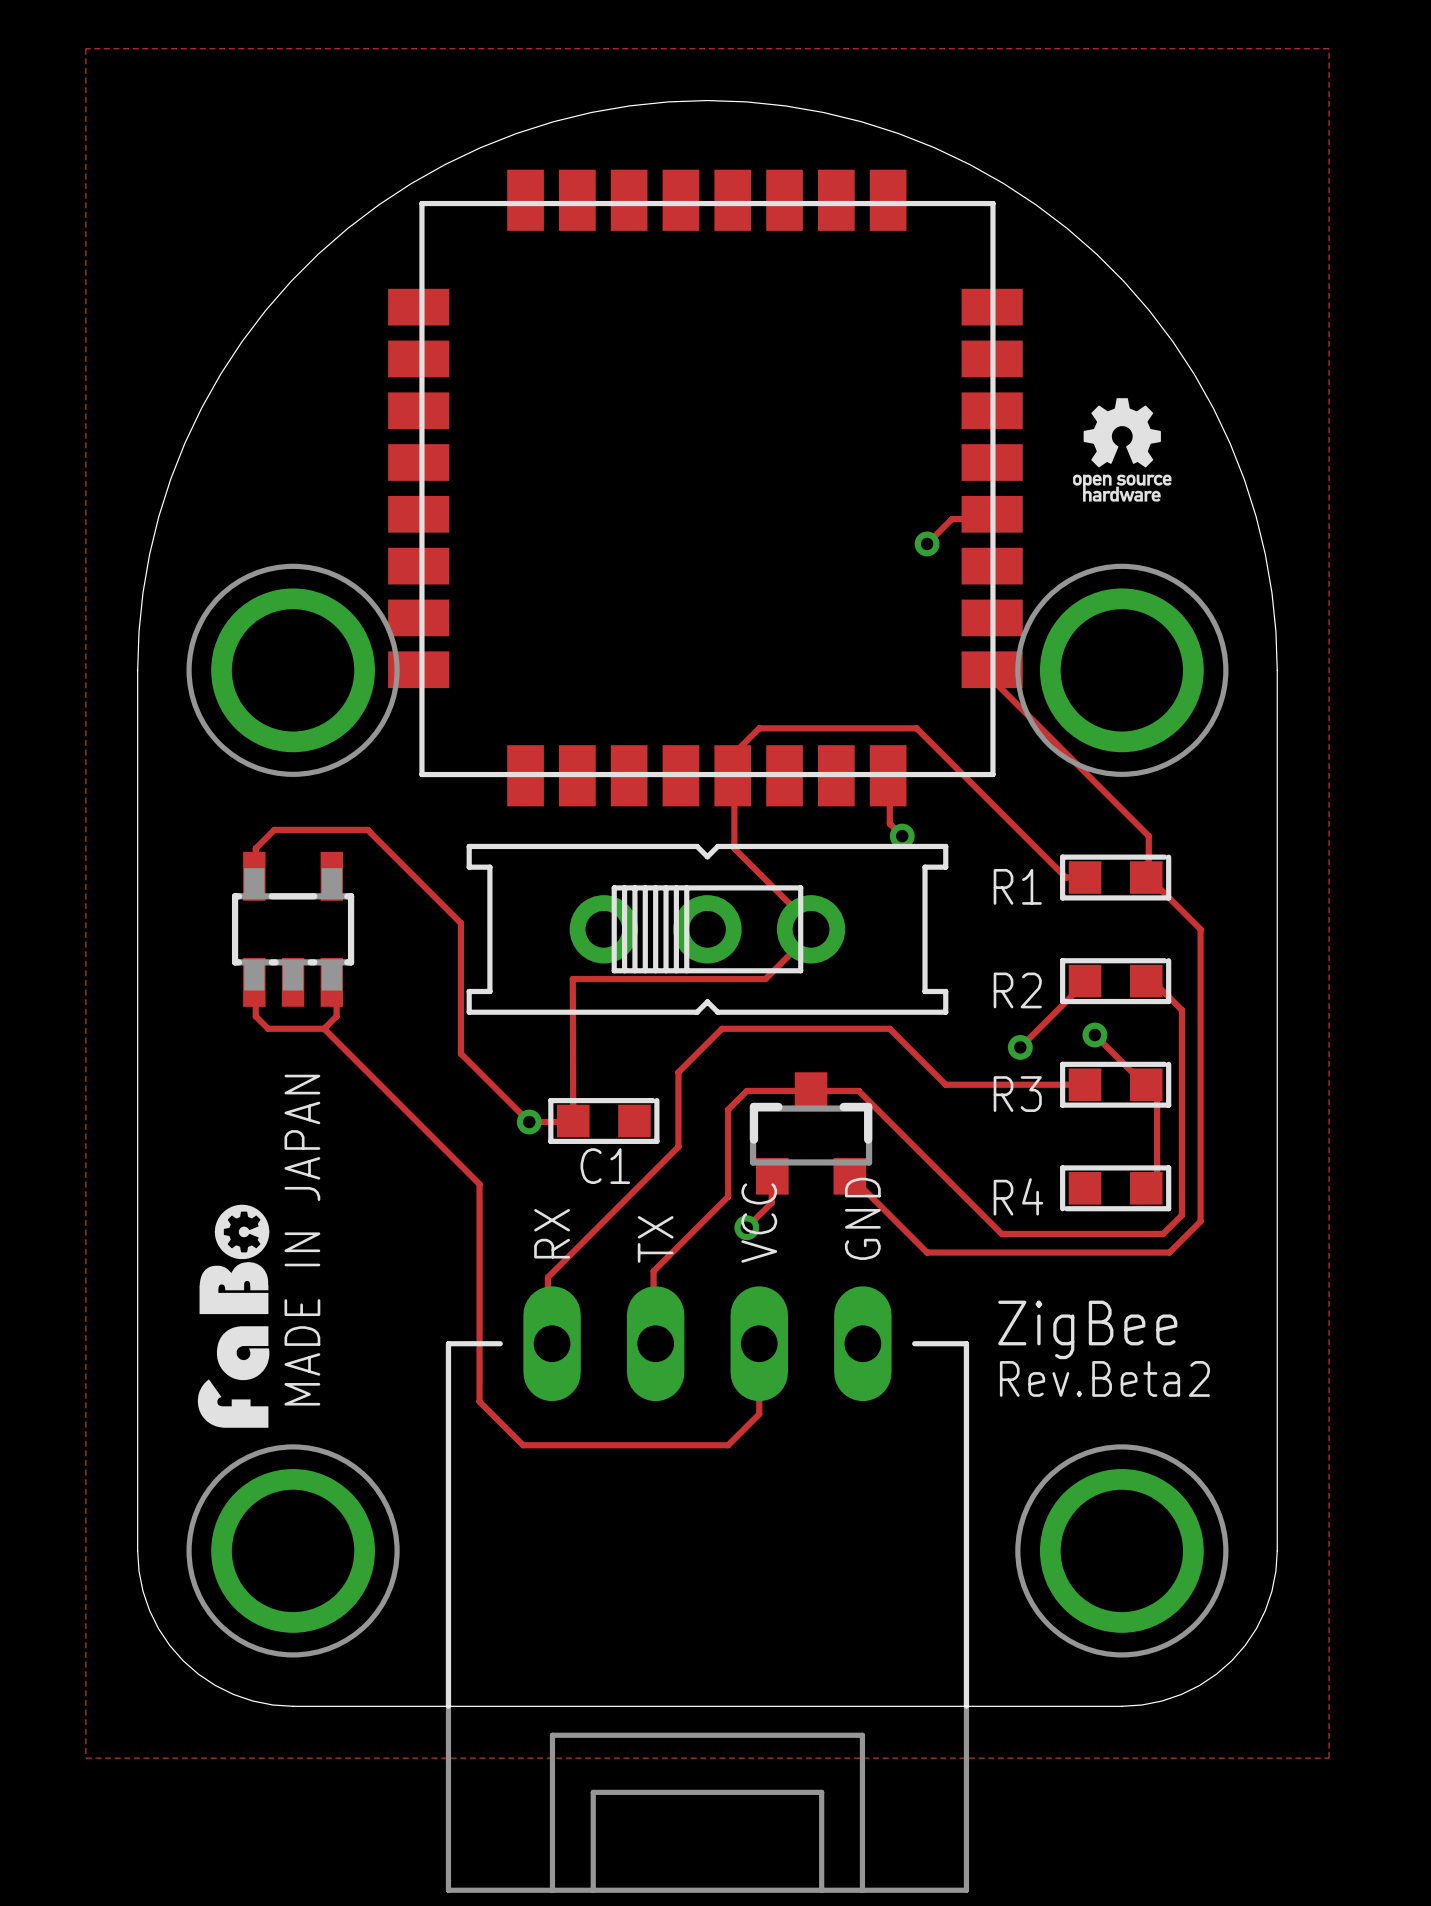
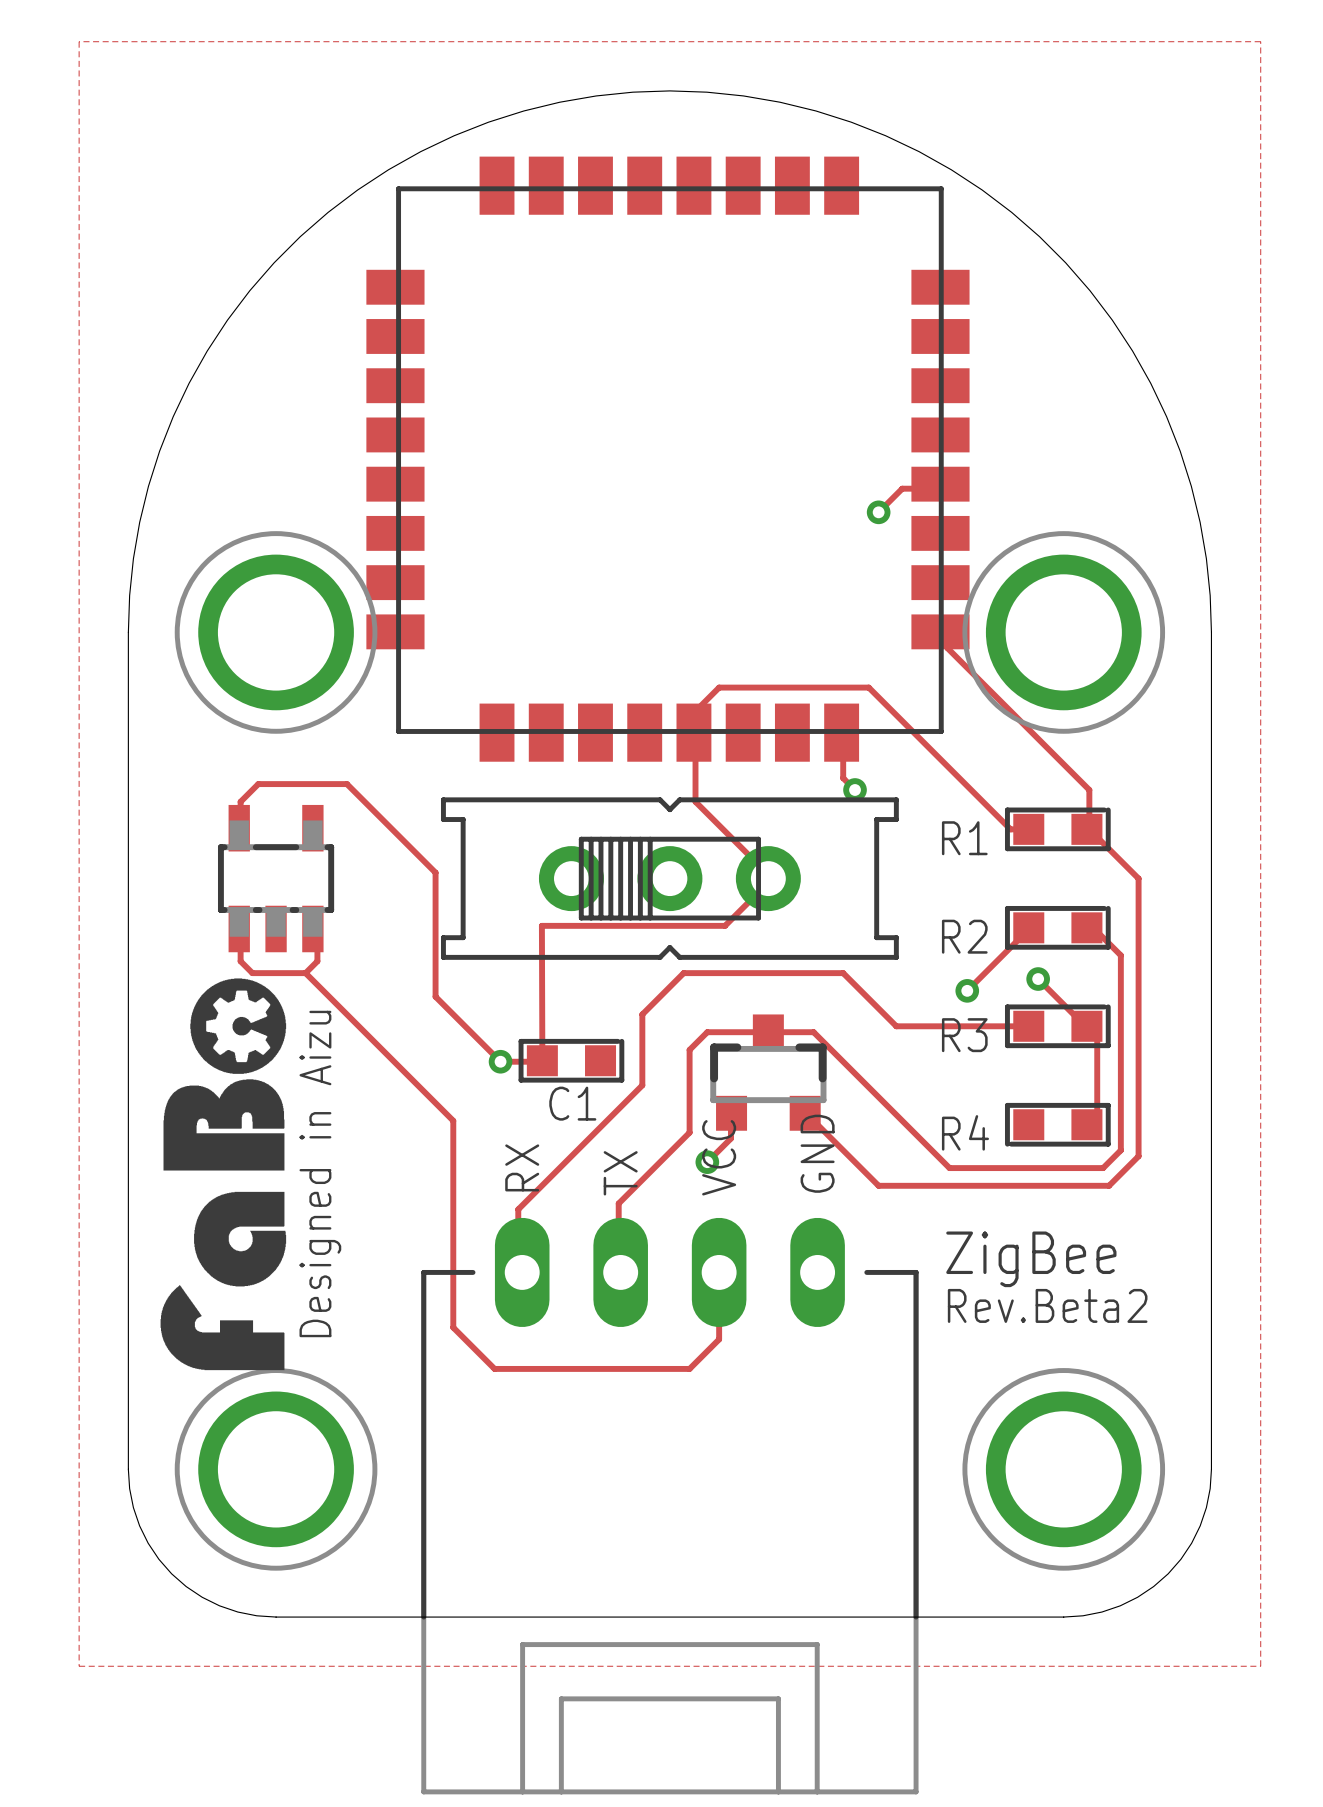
drawing: [1073, 398, 1172, 502] -> none
drawing: none -> [160, 978, 287, 1371]
drawing: [197, 1204, 270, 1428] -> none
text: MADE IN JAPAN (302, 1240) -> Designed in Aizu (320, 1173)

